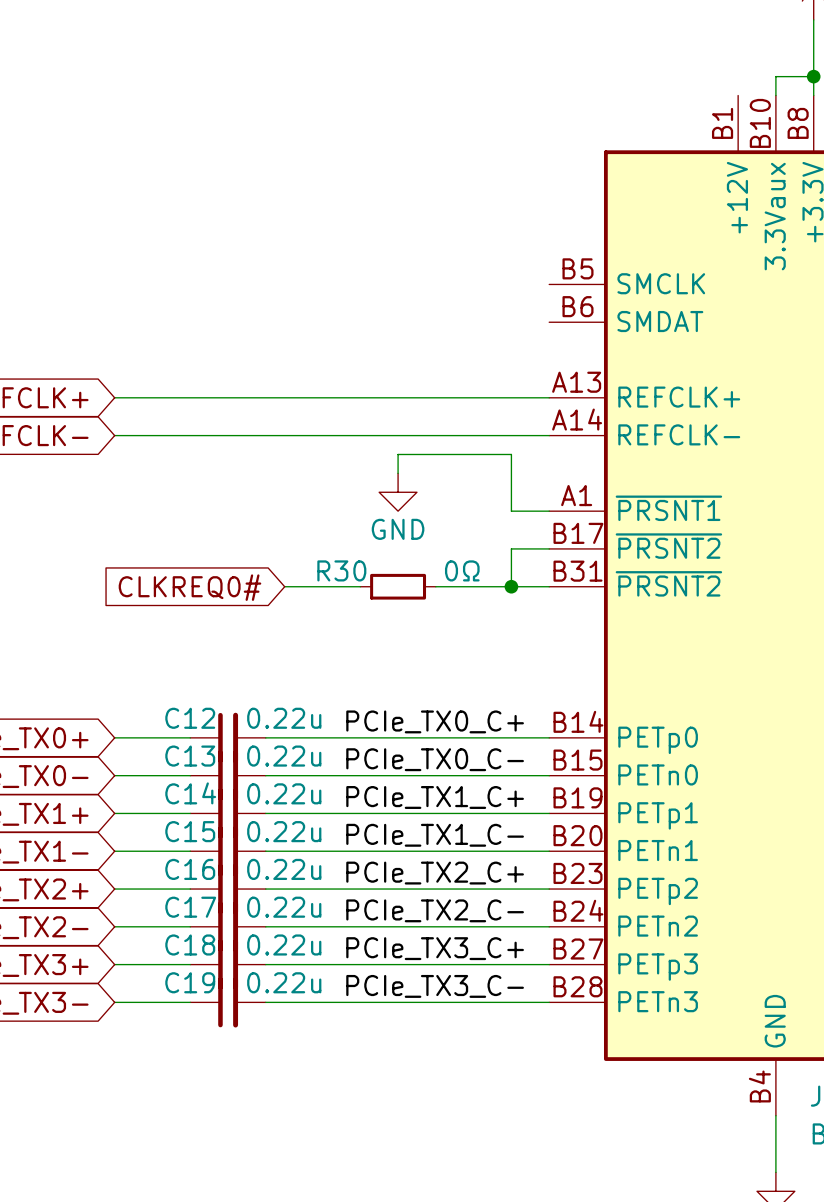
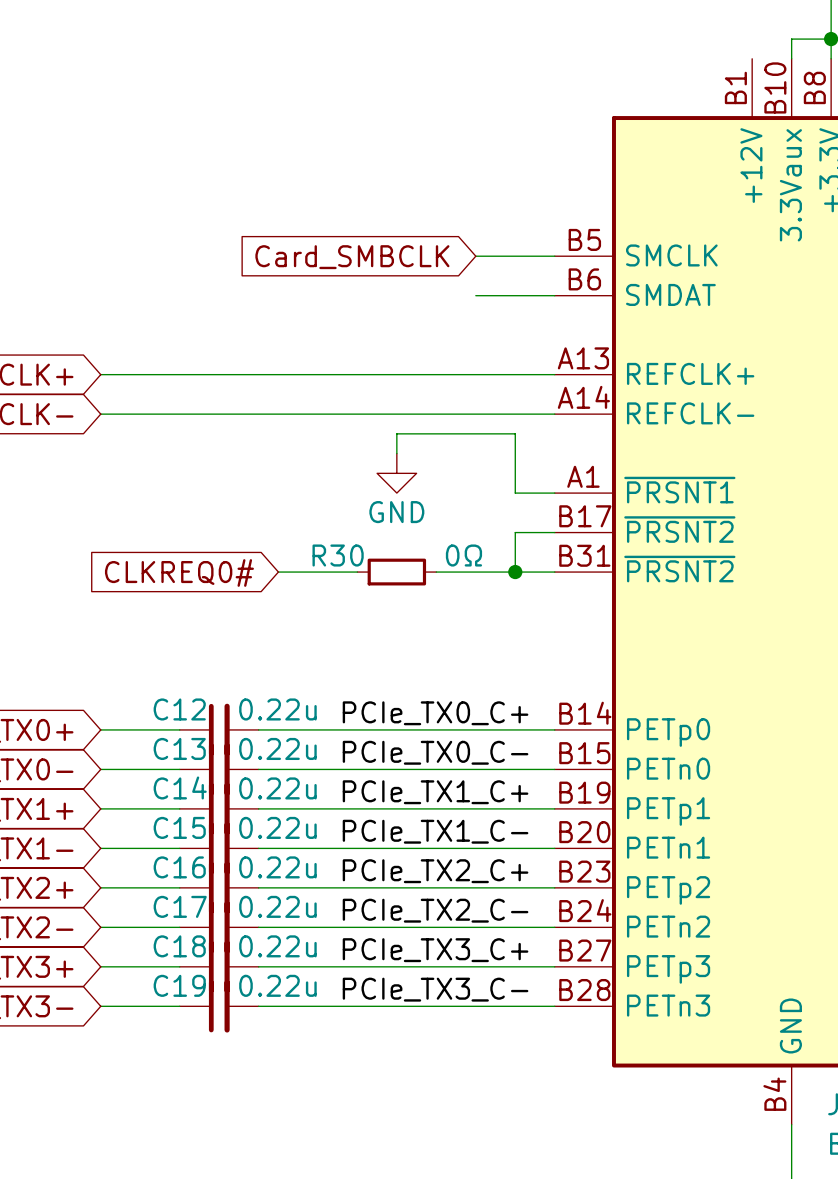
wire: none -> (475, 256) (554, 256)
global label: none -> Card_SMBCLK (352, 257)
wire: none -> (475, 295) (554, 295)

